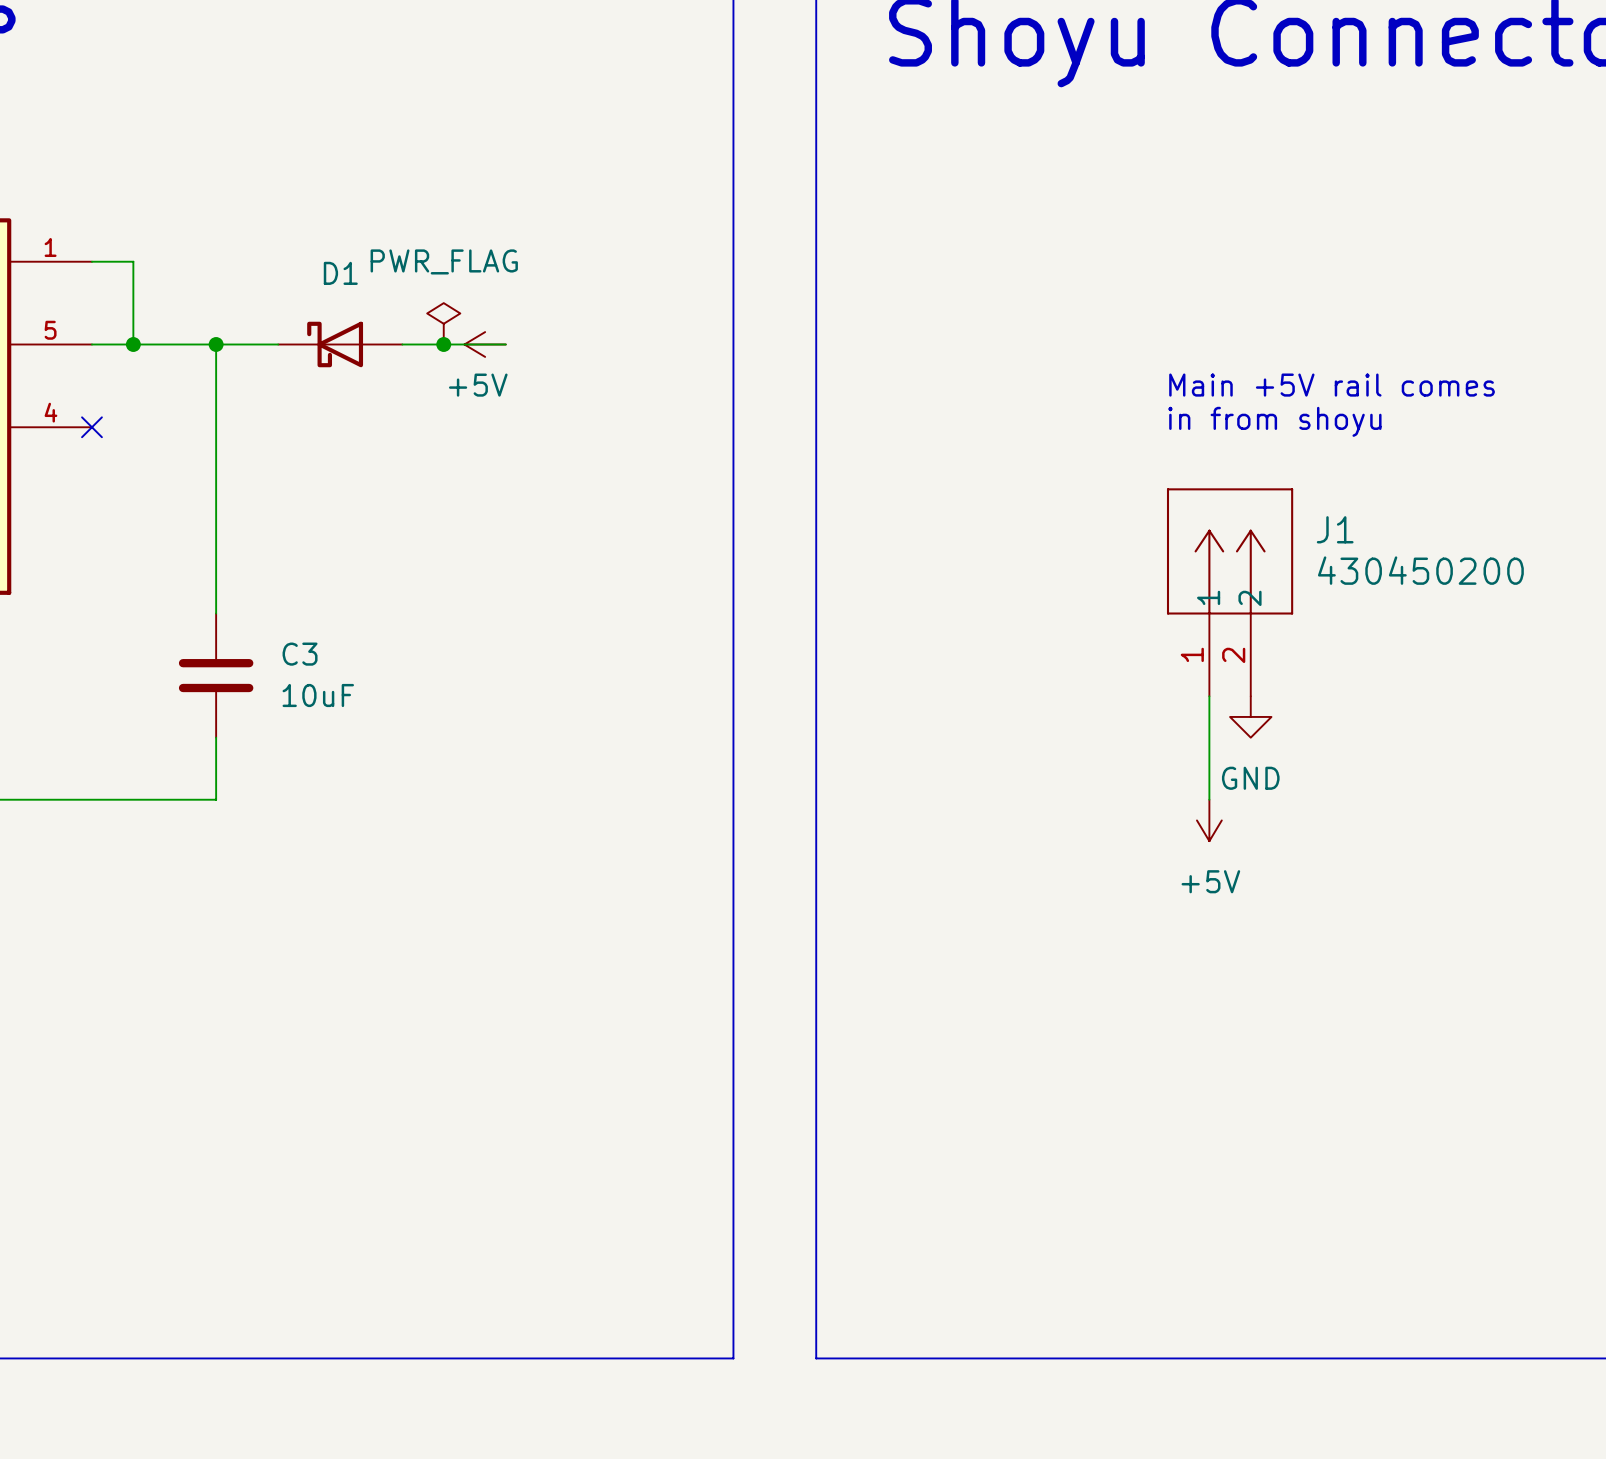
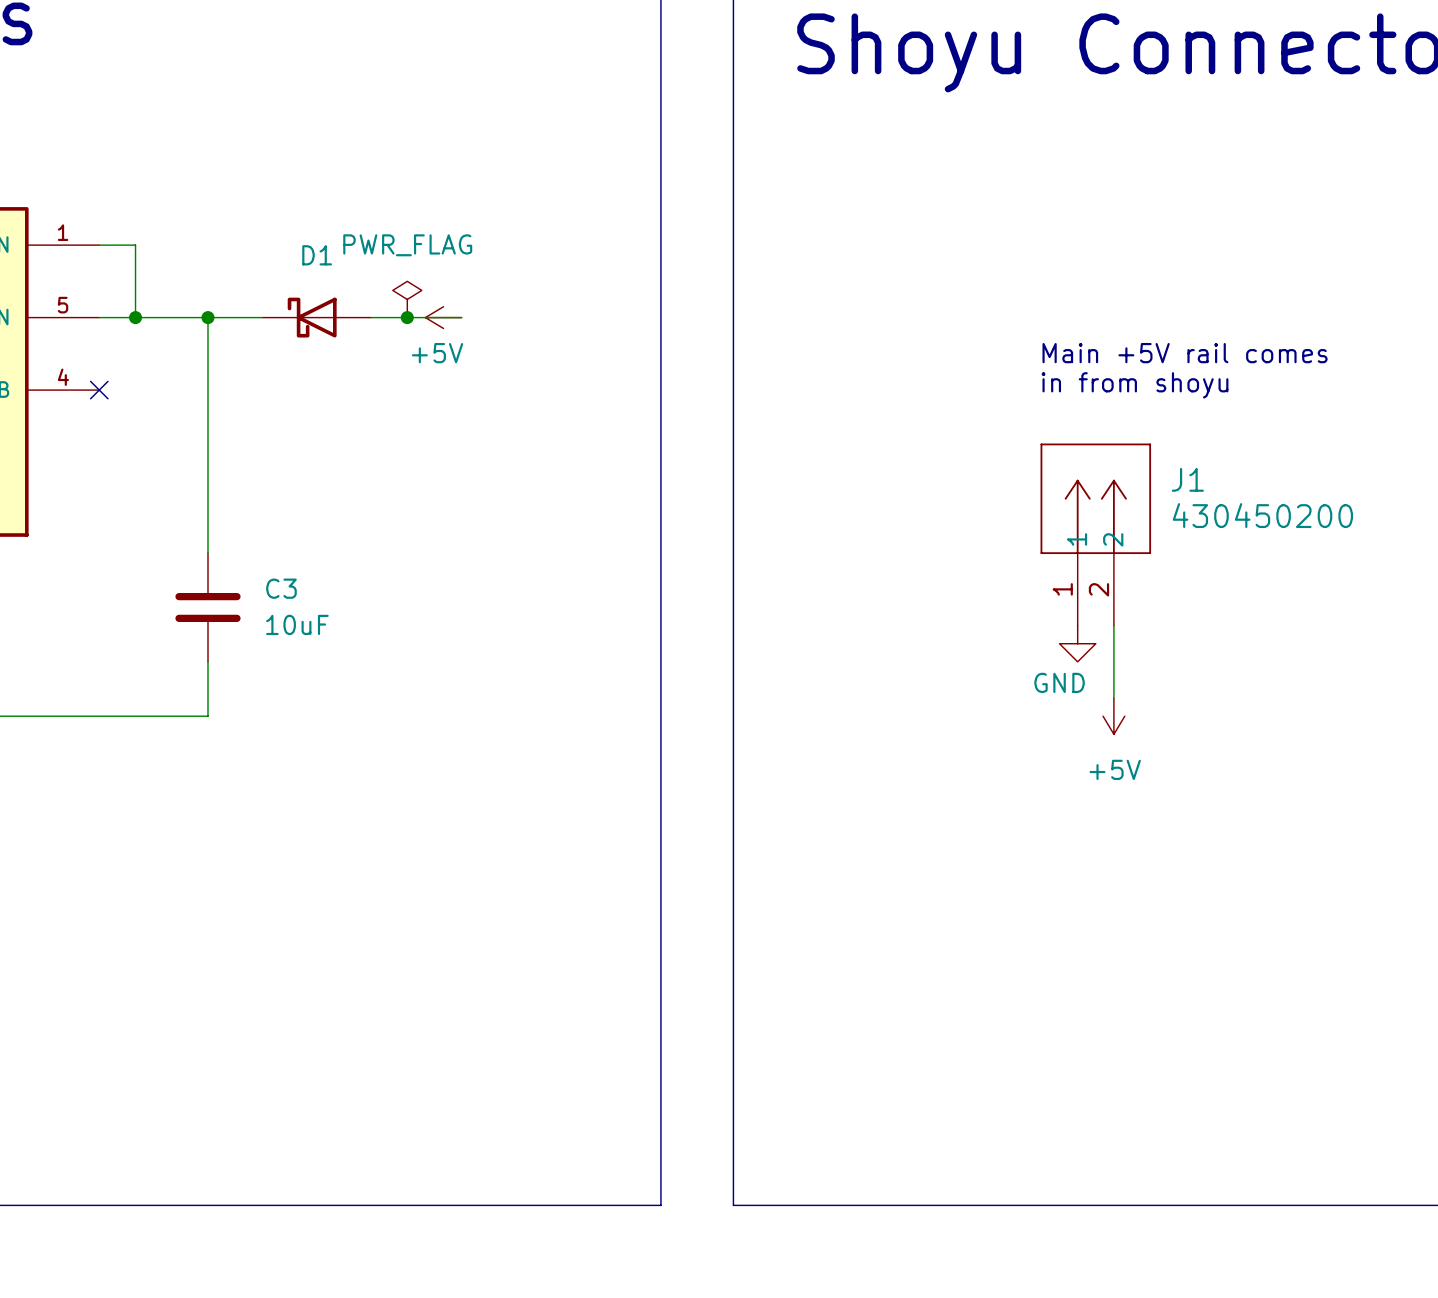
wire: (1209, 696) (1209, 799) -> none
wire: none -> (1113, 625) (1113, 698)
power symbol position: GND (1250, 716) -> GND (1077, 643)
power symbol text position: GND (1250, 778) -> GND (1059, 682)
power symbol position: +5V (1209, 820) -> +5V (1113, 716)

